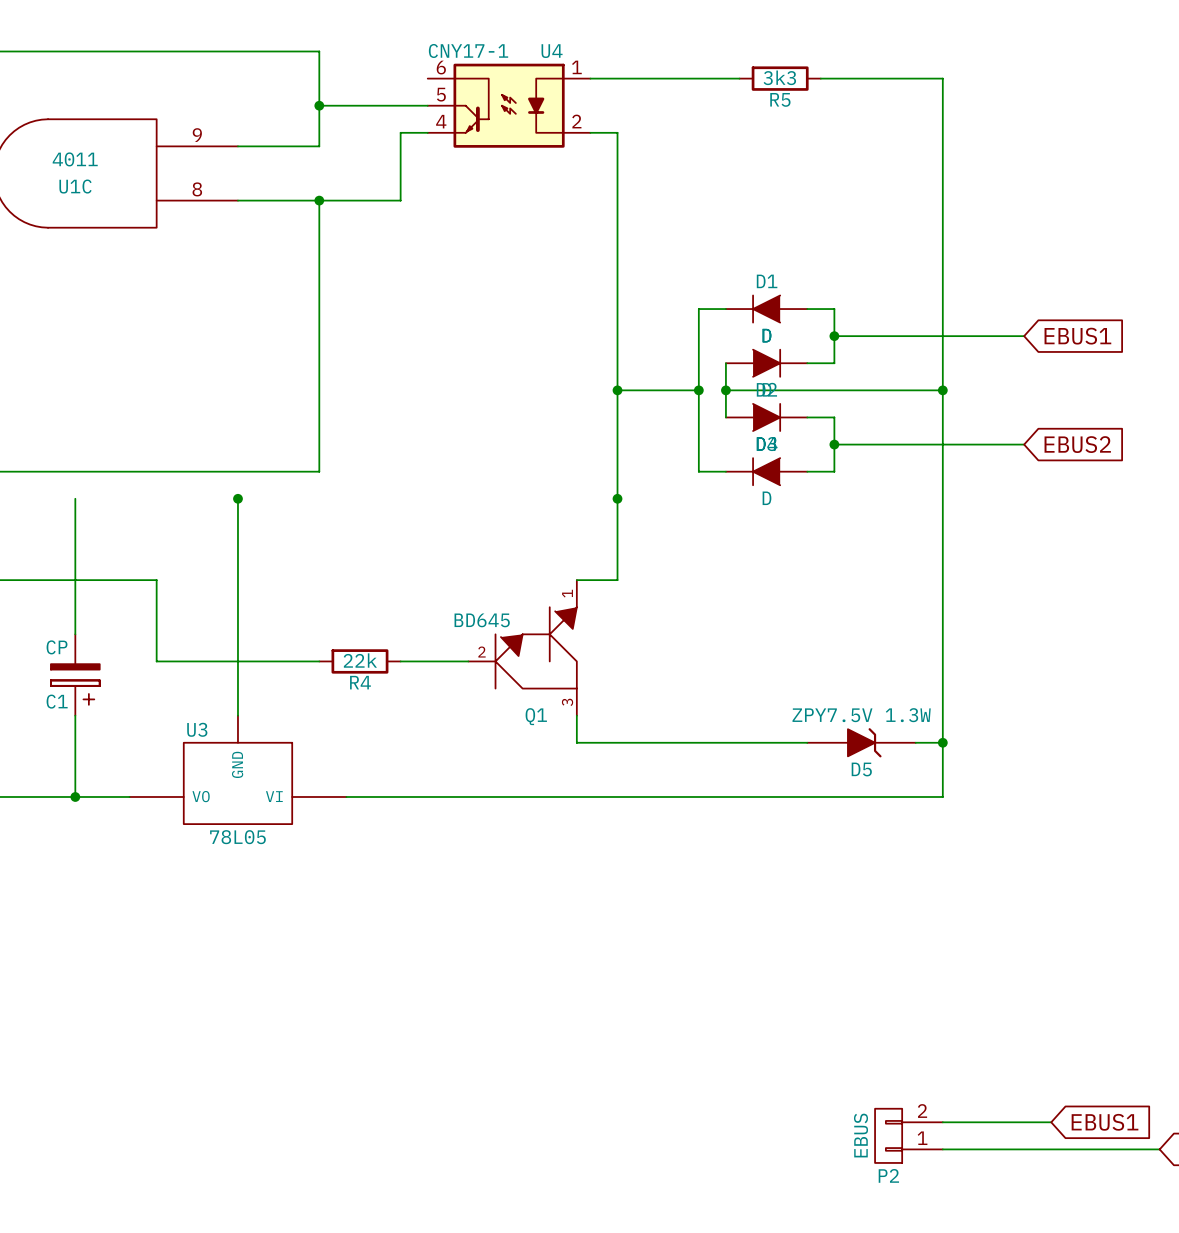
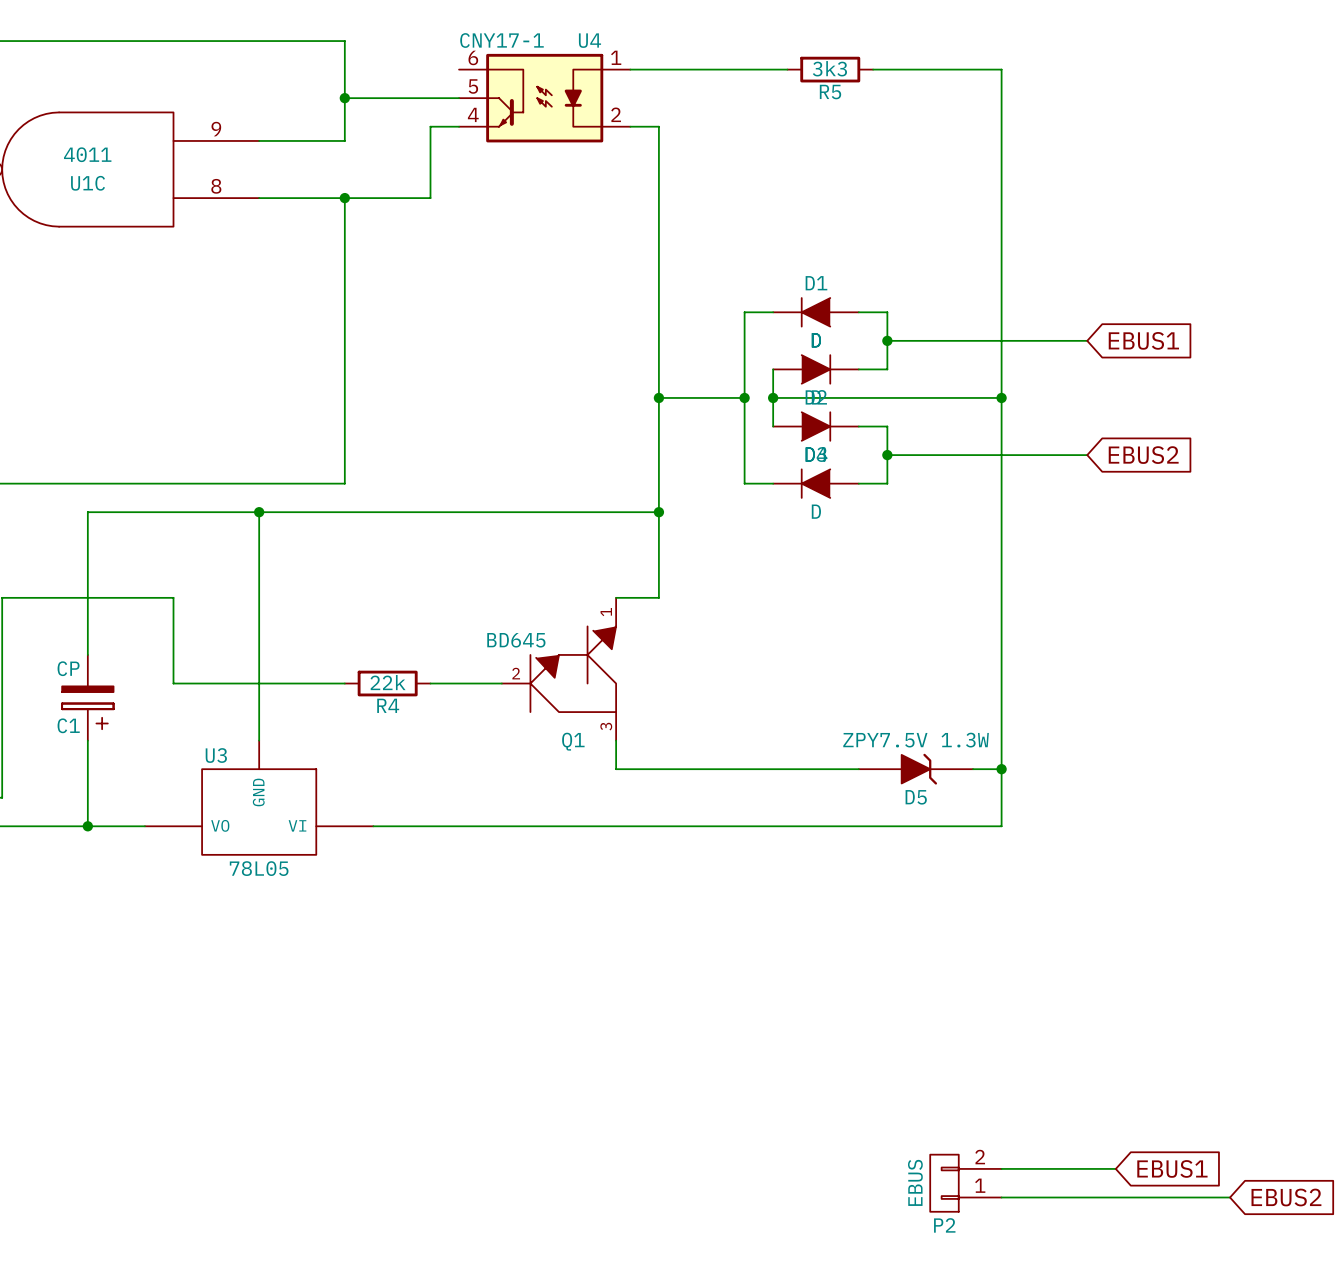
wire: none -> (87, 512) (658, 512)

